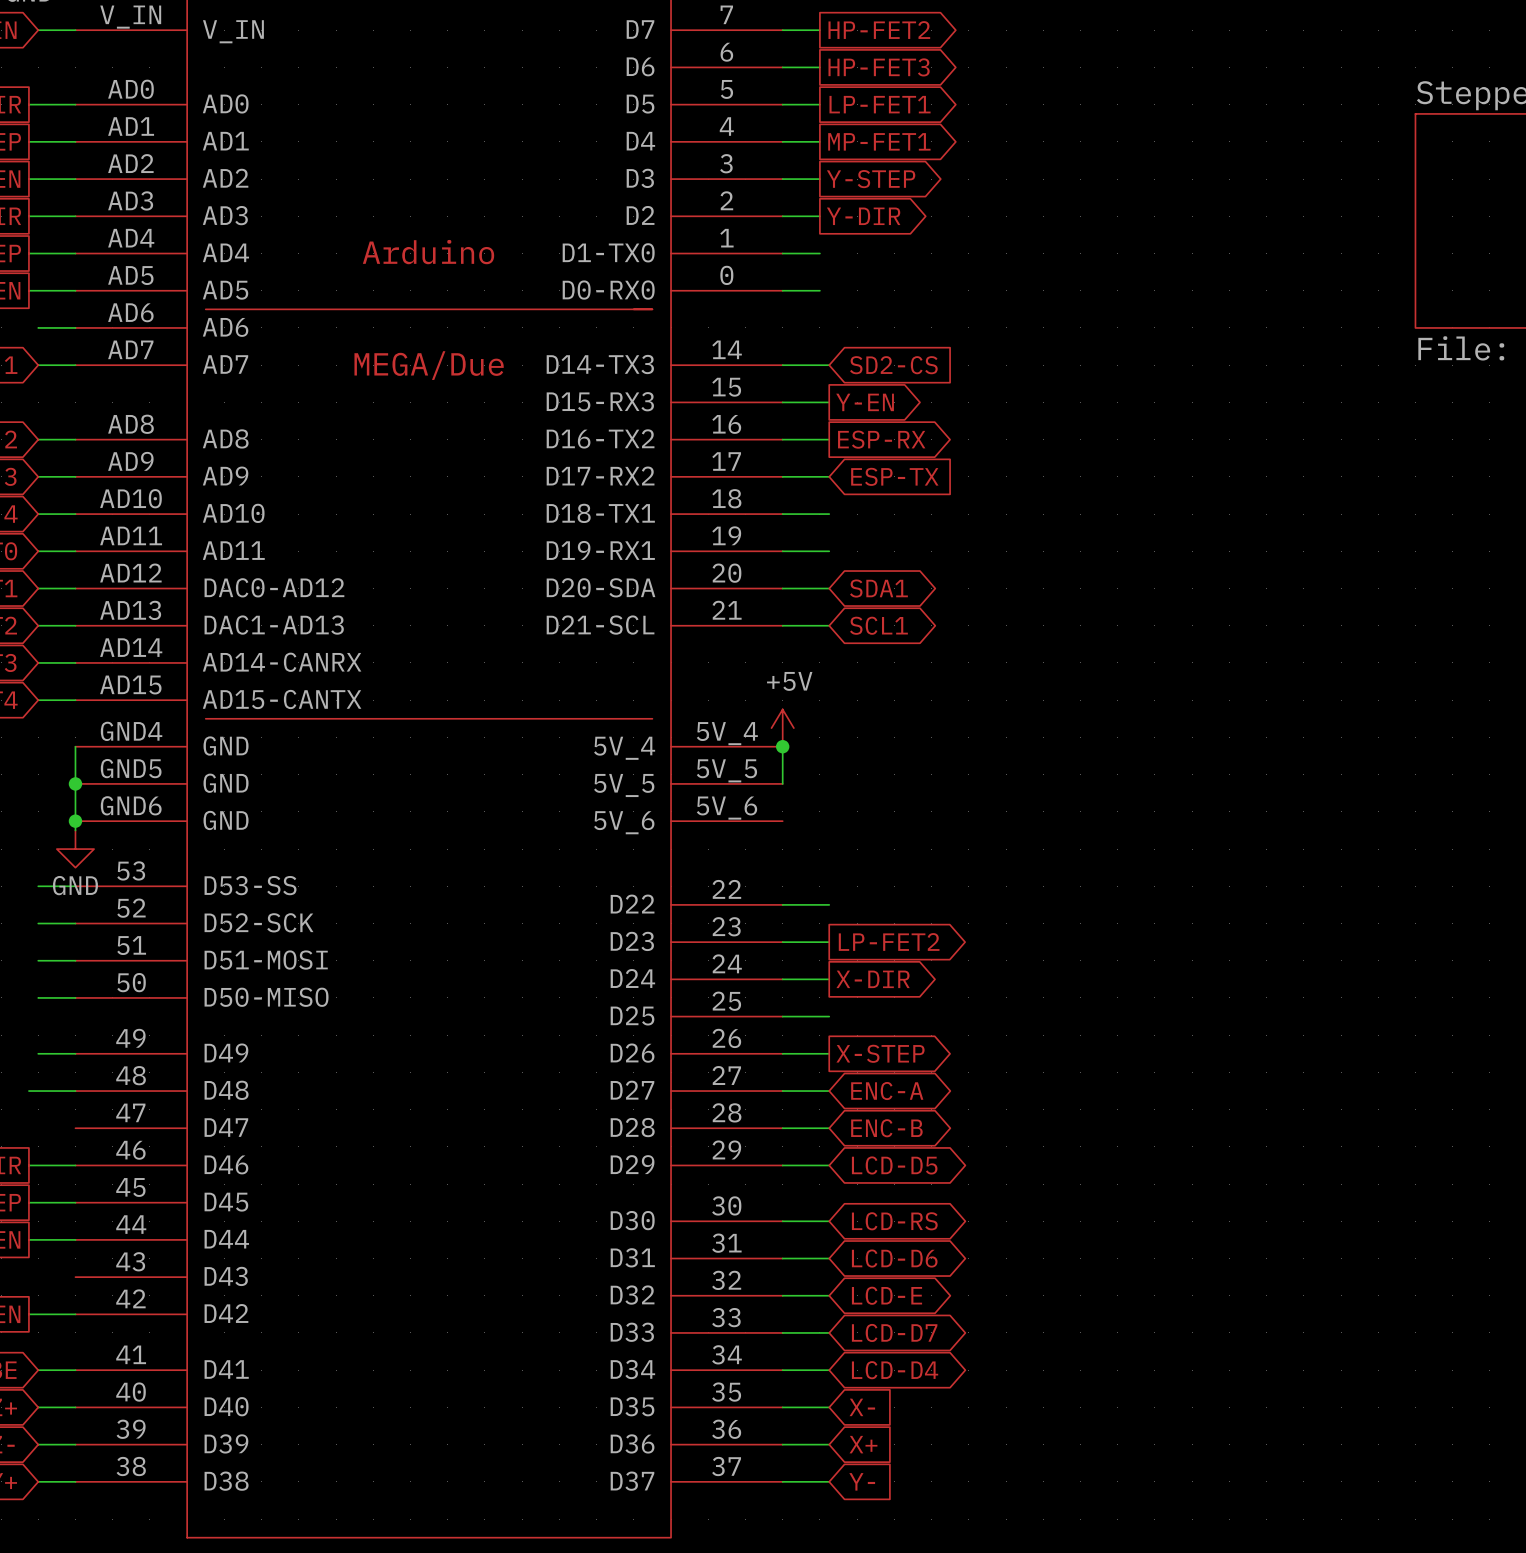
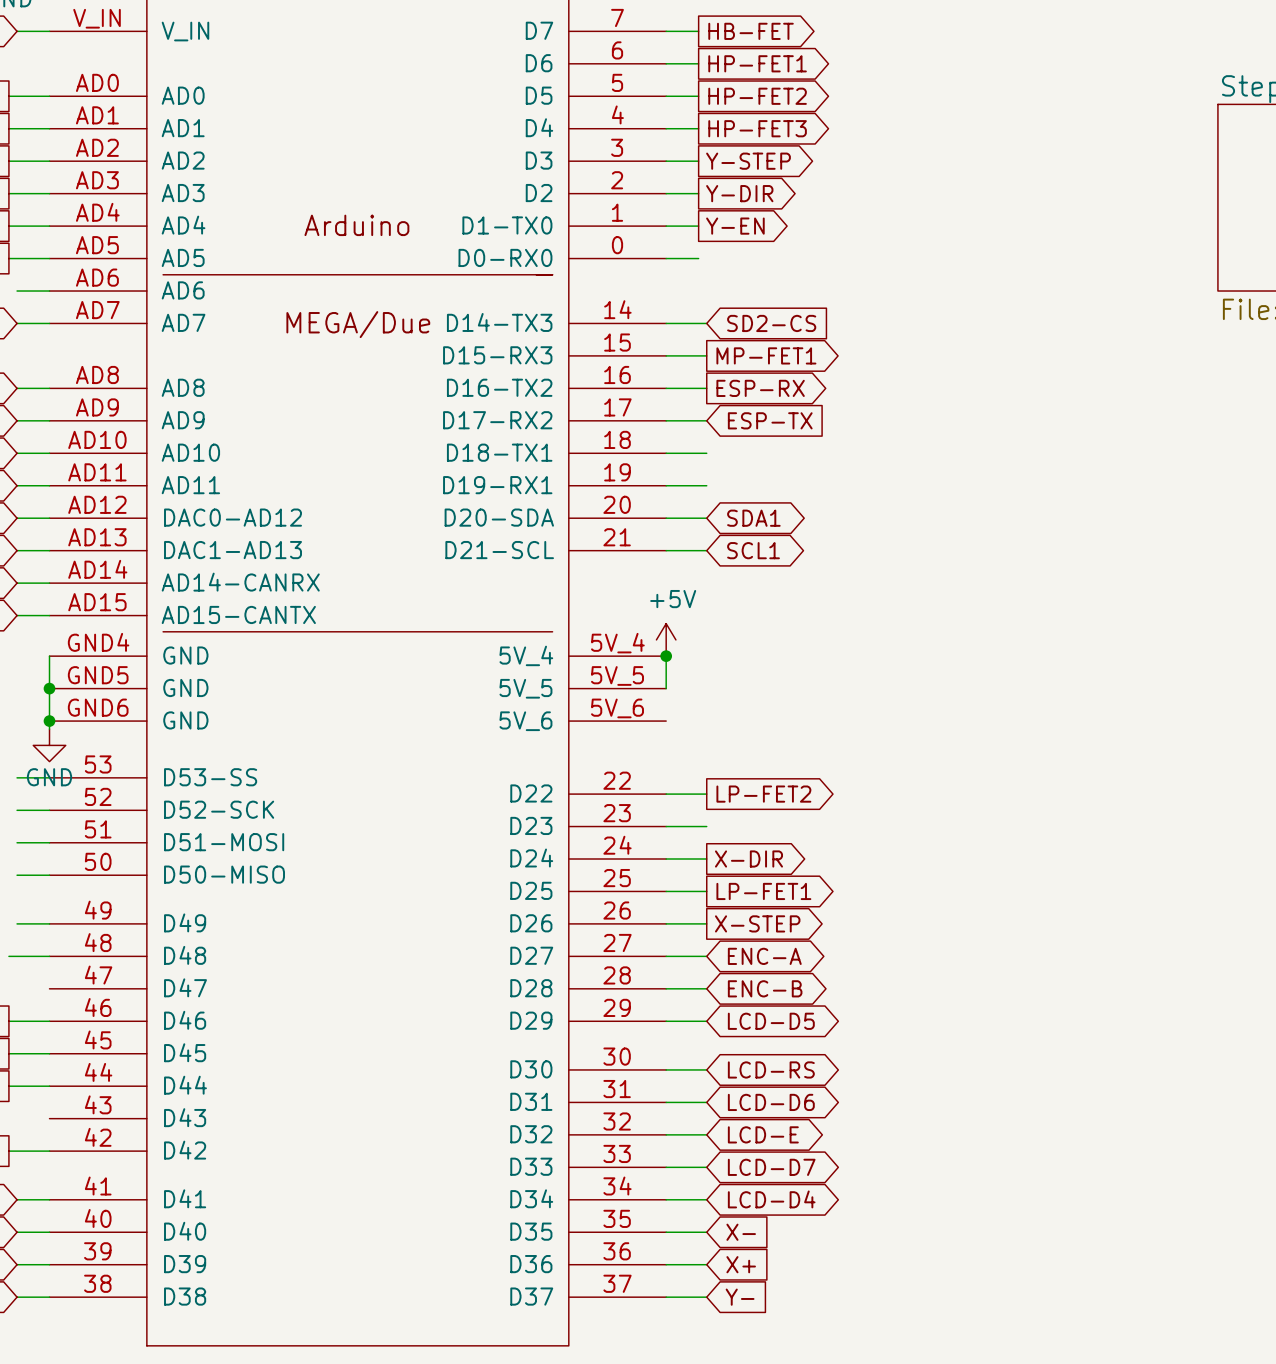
global label: HP-FET2 (879, 30) -> HB-FET (751, 31)
global label: HP-FET3 (879, 67) -> HP-FET1 (757, 63)
global label: LP-FET1 (880, 104) -> HP-FET2 (757, 96)
global label: MP-FET1 (879, 141) -> HP-FET3 (757, 128)
global label: none -> Y-EN (735, 226)
global label: Y-EN (865, 402) -> MP-FET1 (766, 355)
global label position: LP-FET2 (889, 941) -> LP-FET2 (763, 794)
global label: none -> LP-FET1 (763, 891)

